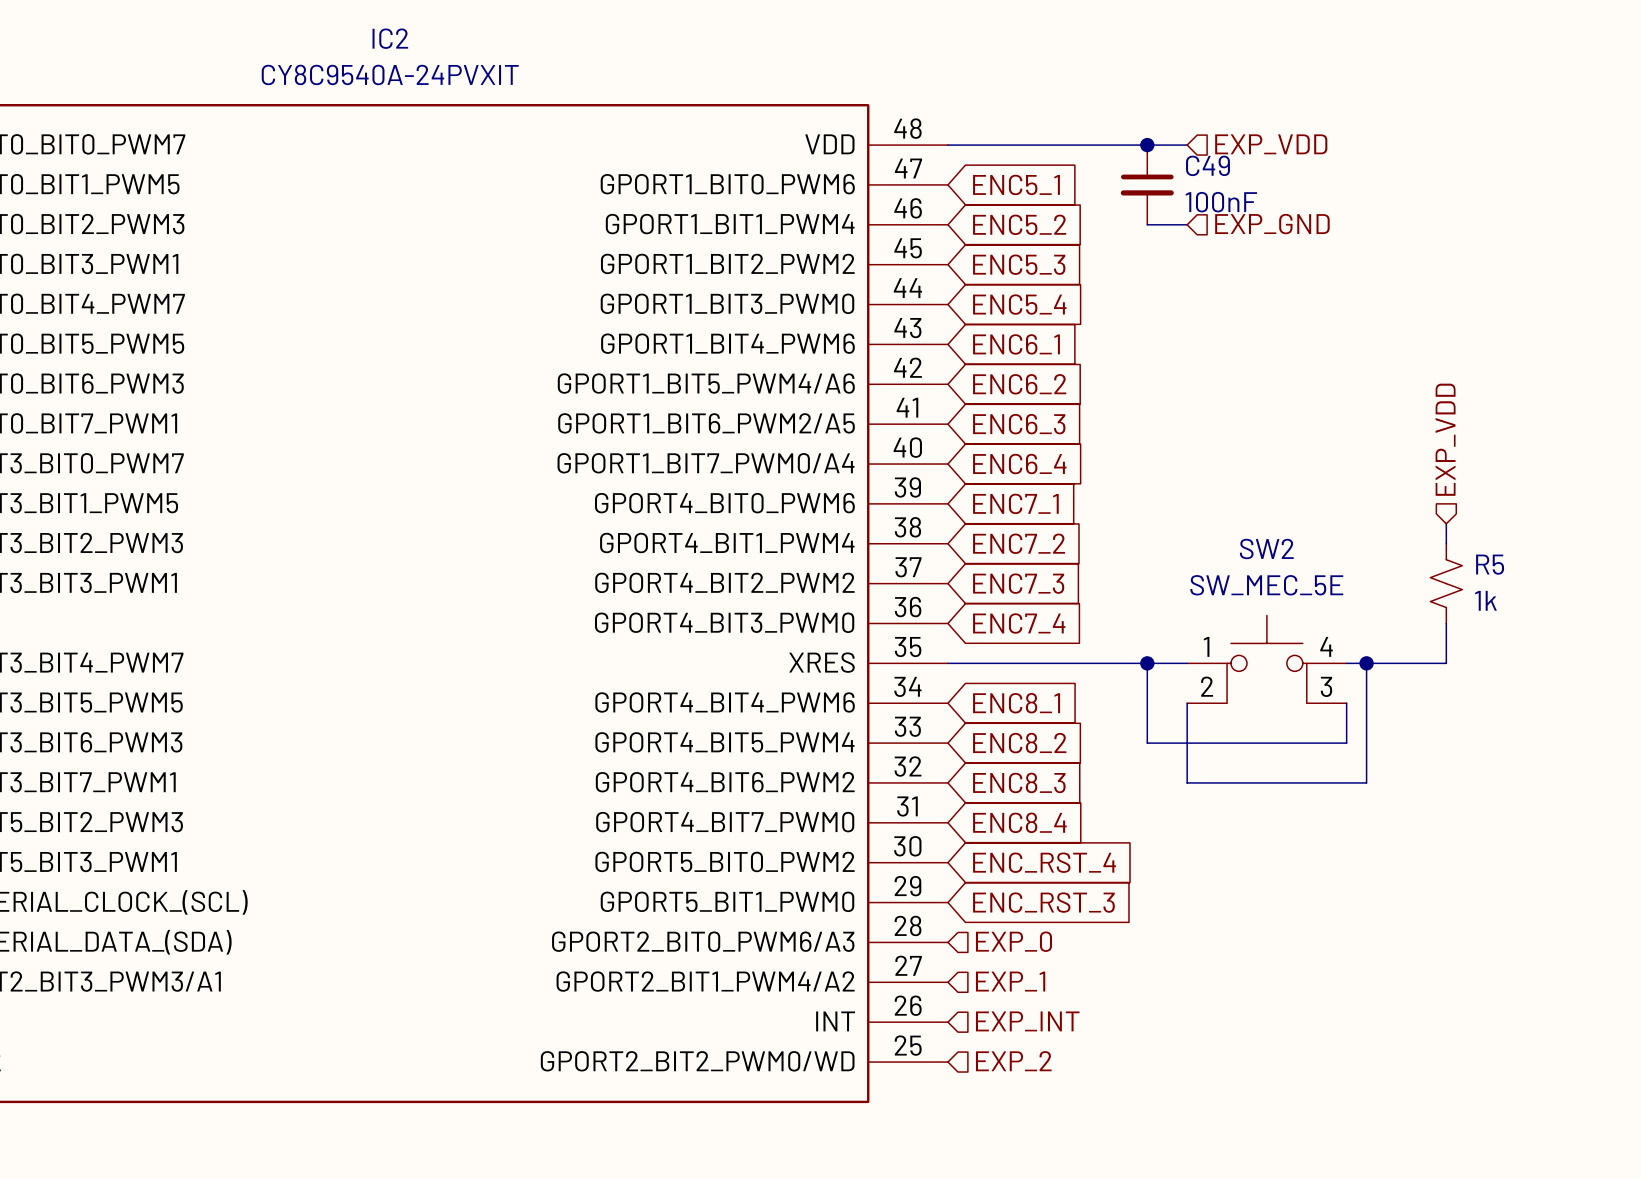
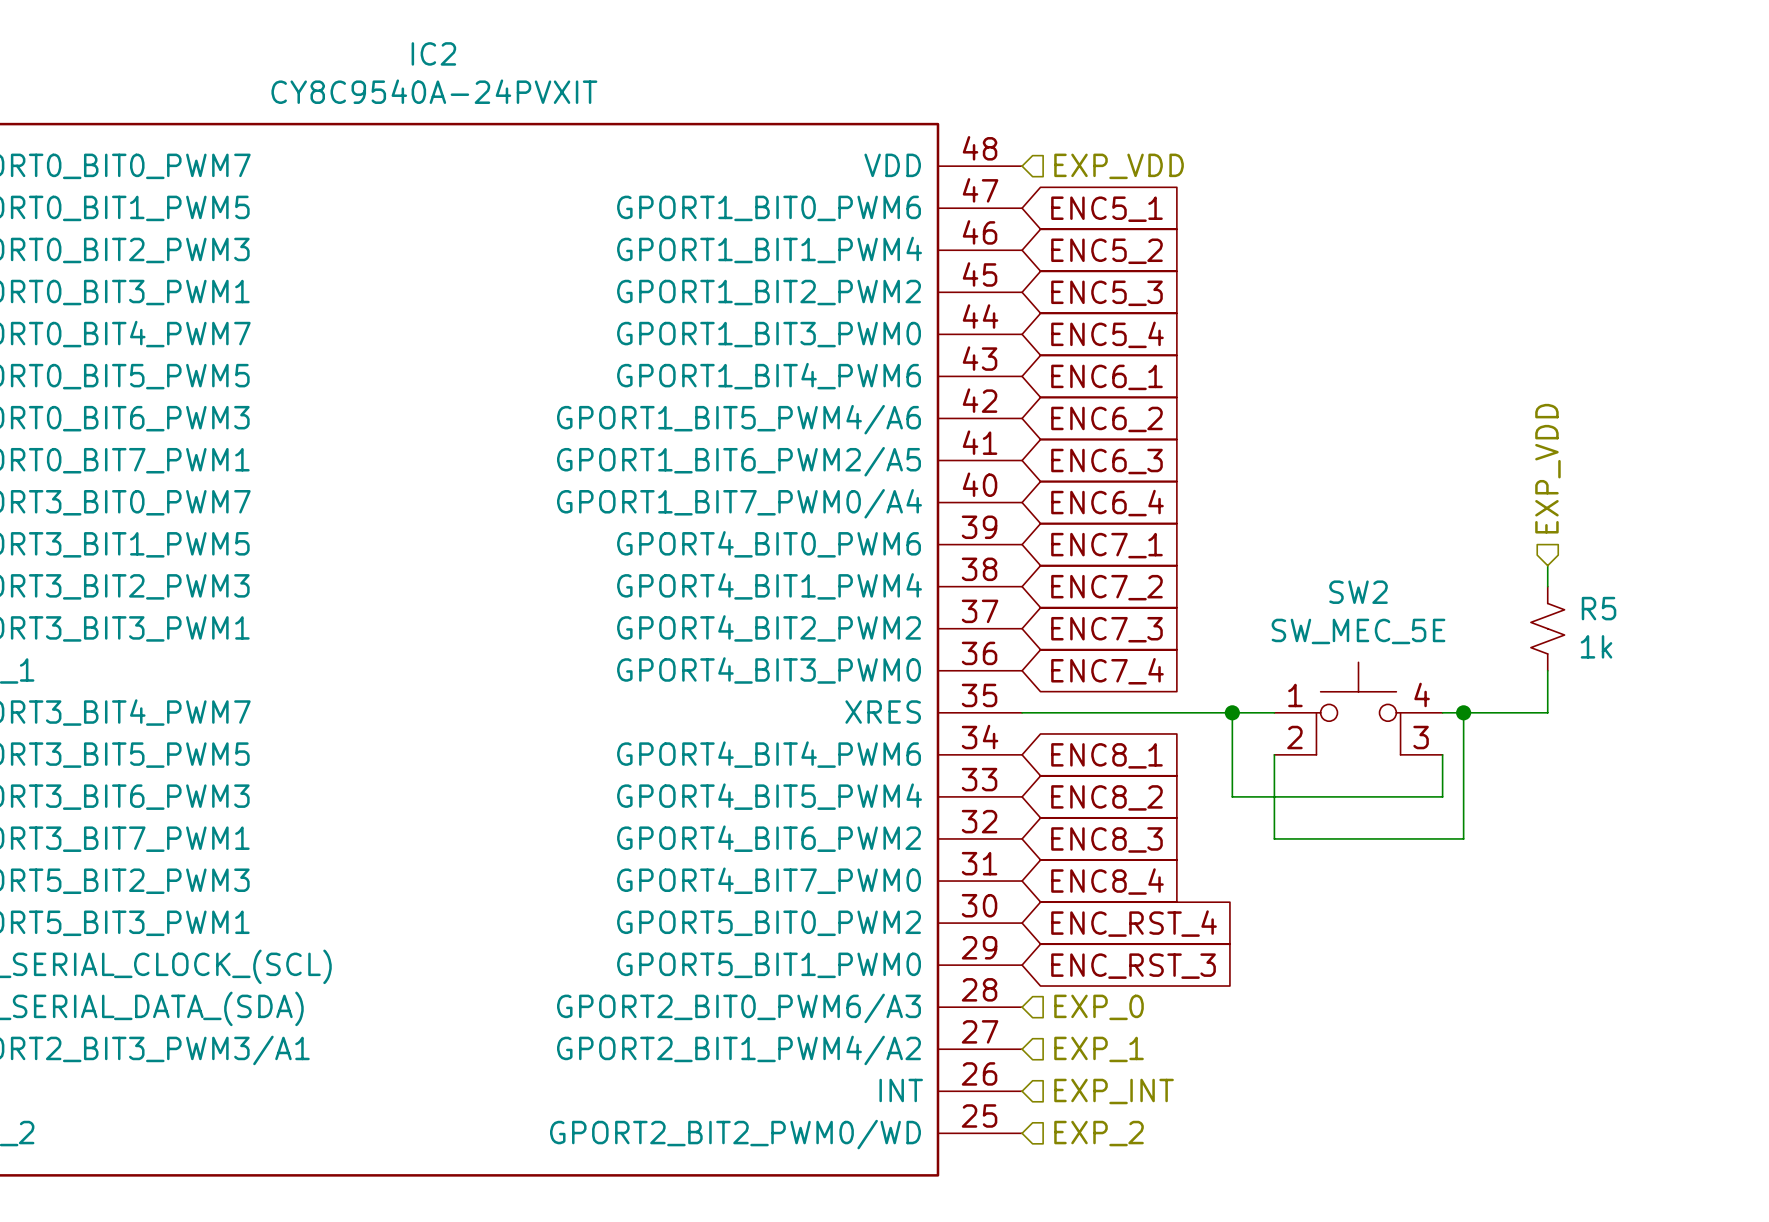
hierarchical label position: EXP_VDD (1271, 144) -> EXP_VDD (1119, 166)
wire: (947, 145) (1187, 145) -> none
junction: (1147, 145) -> none
C49: 100nF (1147, 184) -> none
wire: (1147, 224) (1187, 224) -> none
hierarchical label: EXP_GND (1272, 224) -> none

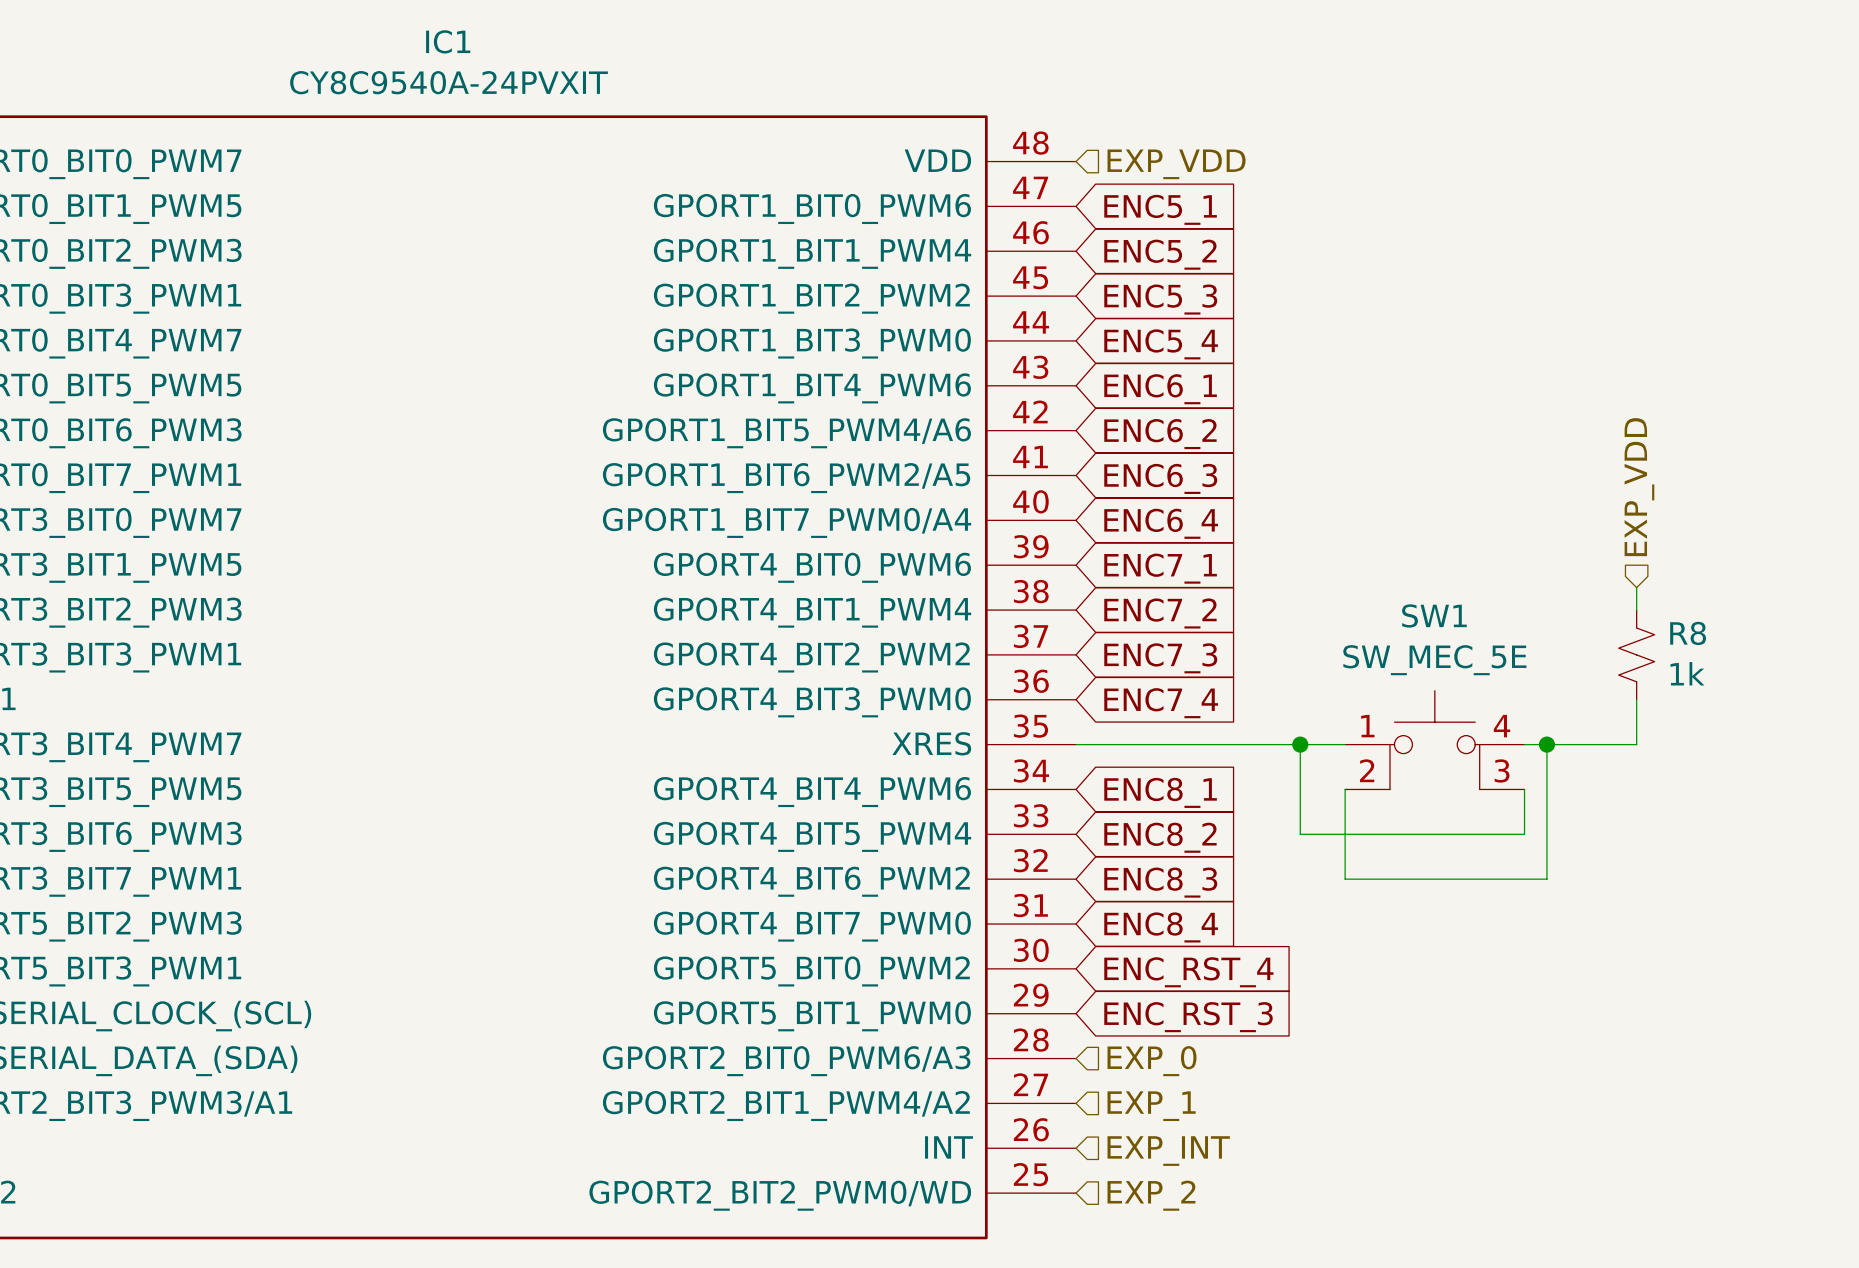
IC2 name: IC2 (433, 53) -> IC1 (448, 41)
SW2 name: SW2 (1358, 592) -> SW1 (1434, 615)
R5 name: R5 (1599, 608) -> R8 (1688, 633)

